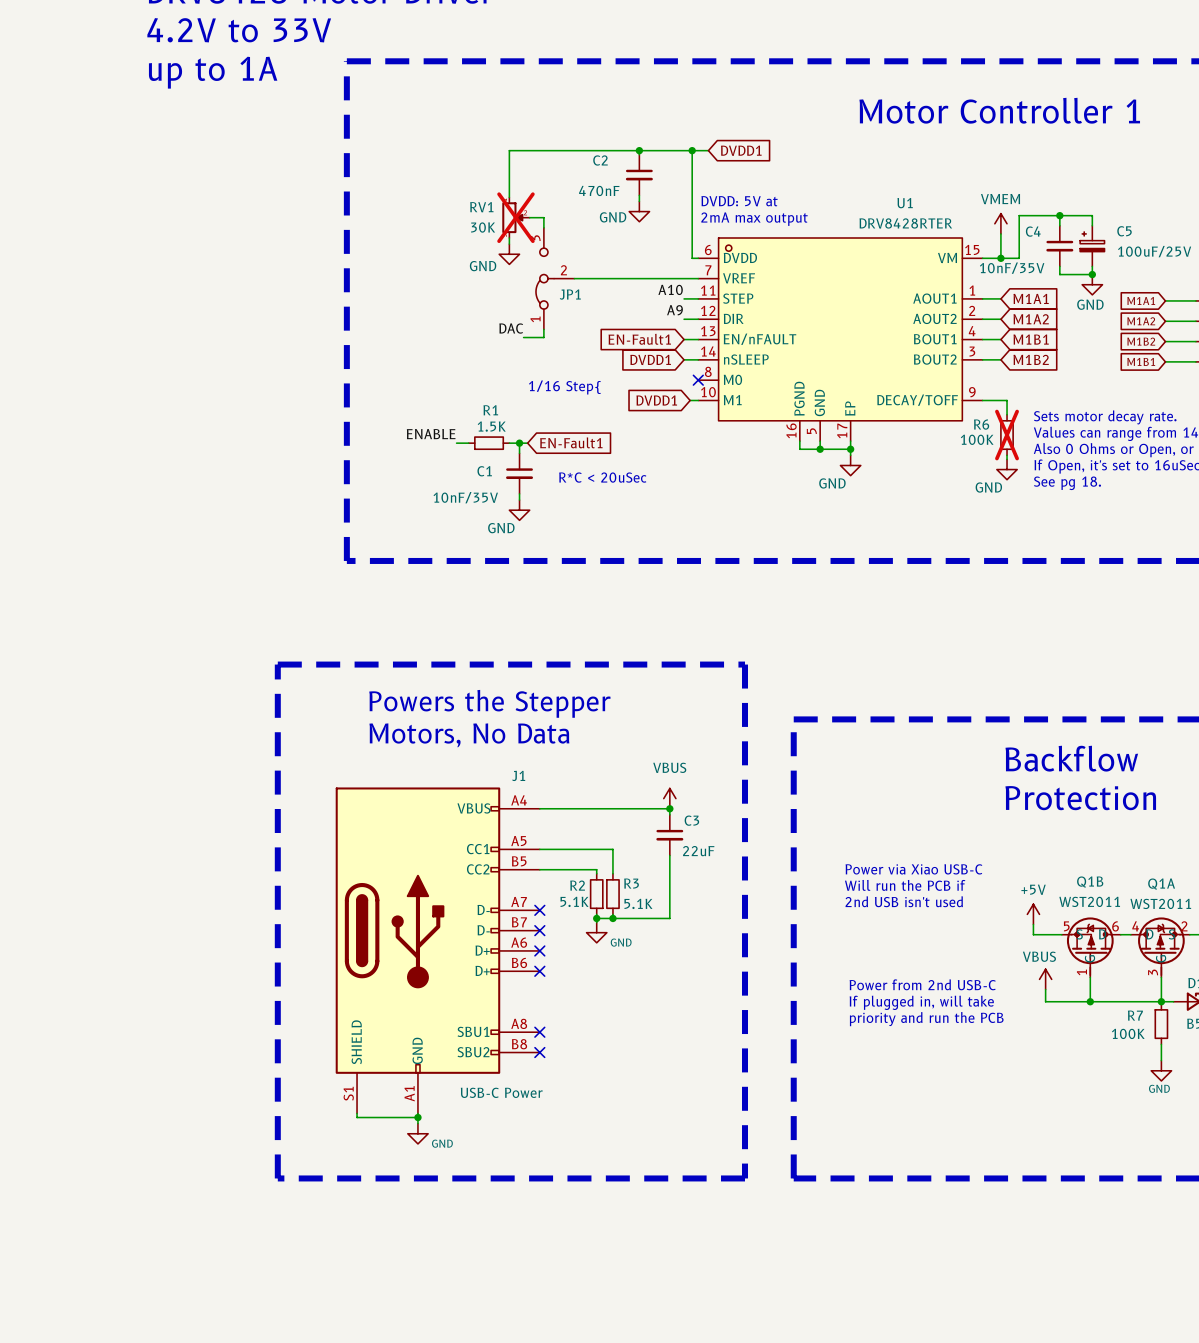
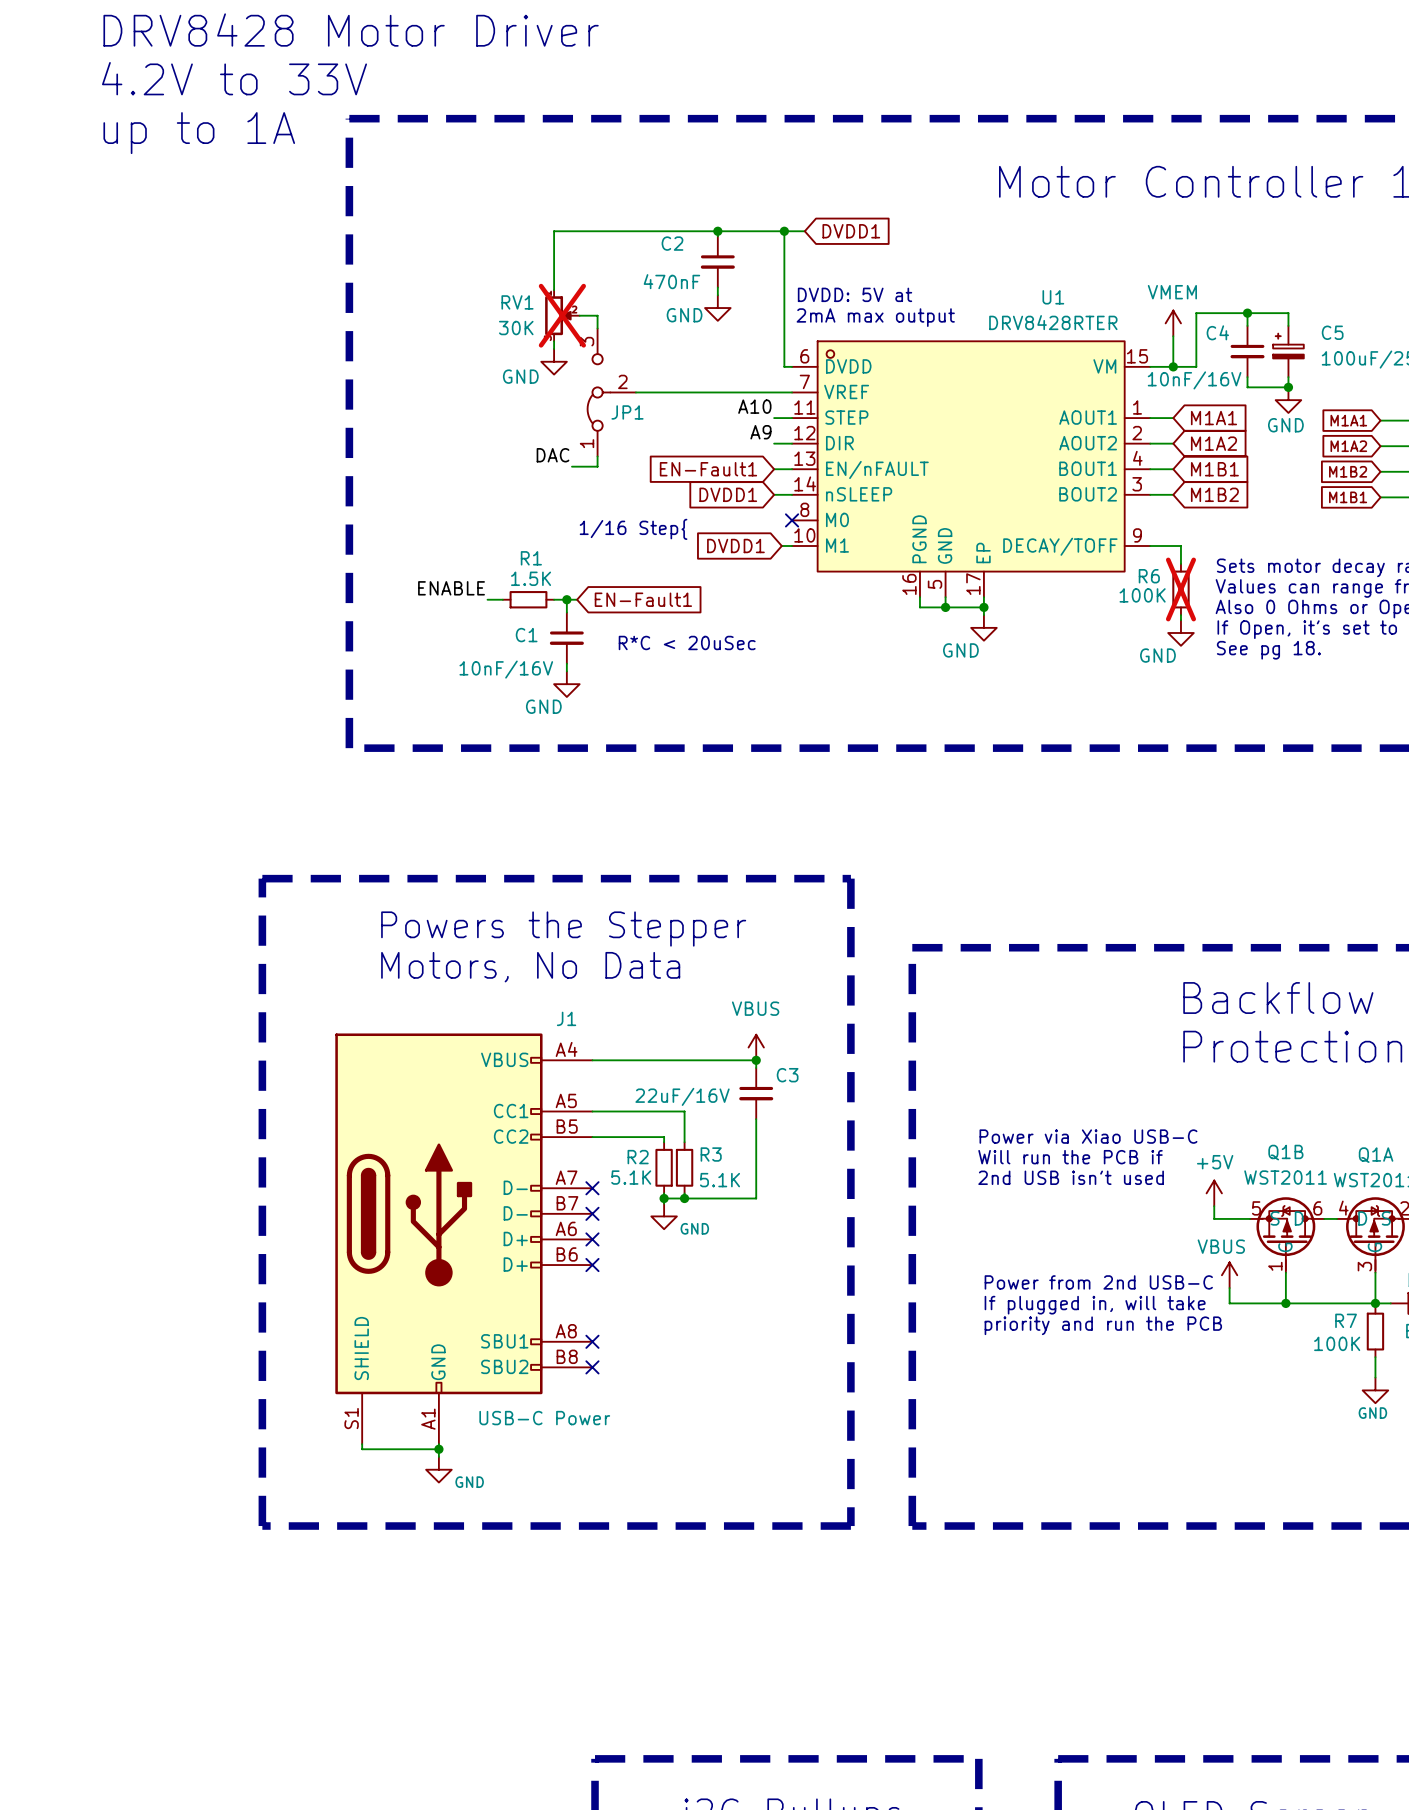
C4 value: 10nF/35V (1012, 268) -> 10nF/16V (1194, 380)
C1 value: 10nF/35V (465, 497) -> 10nF/16V (506, 669)
C3 value: 22uF (698, 851) -> 22uF/16V (682, 1096)

